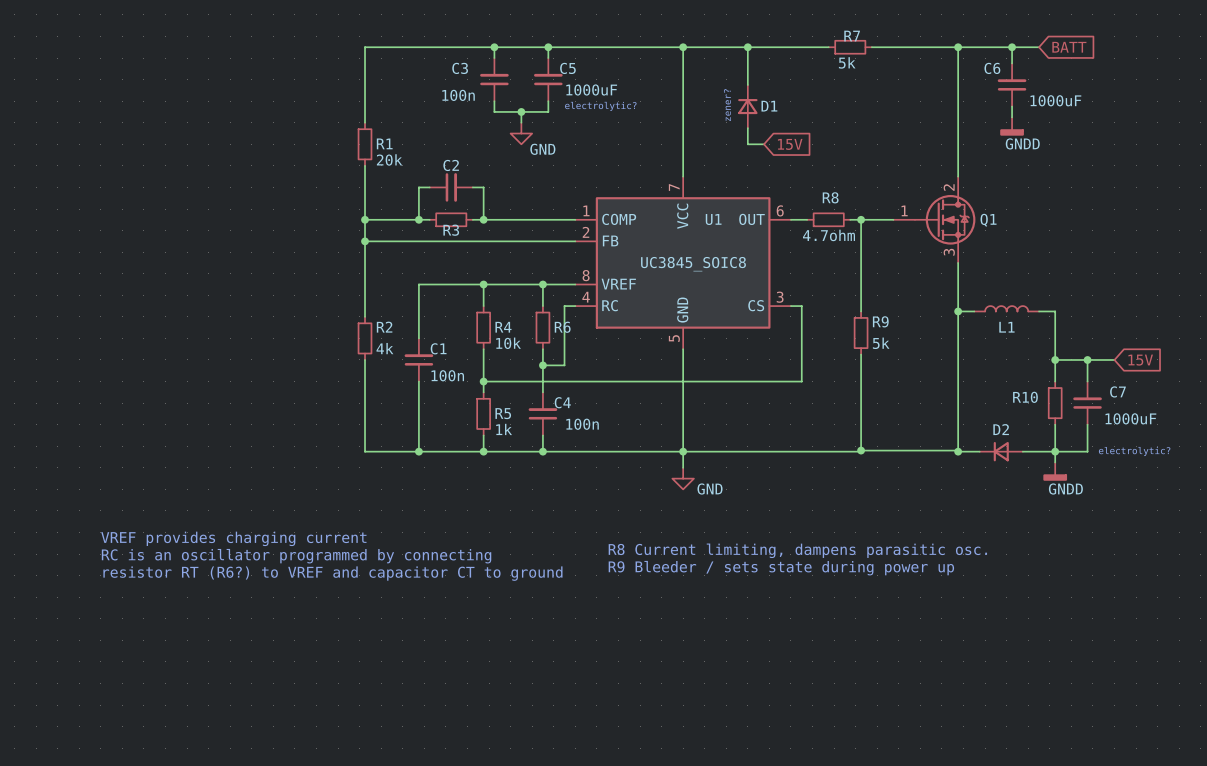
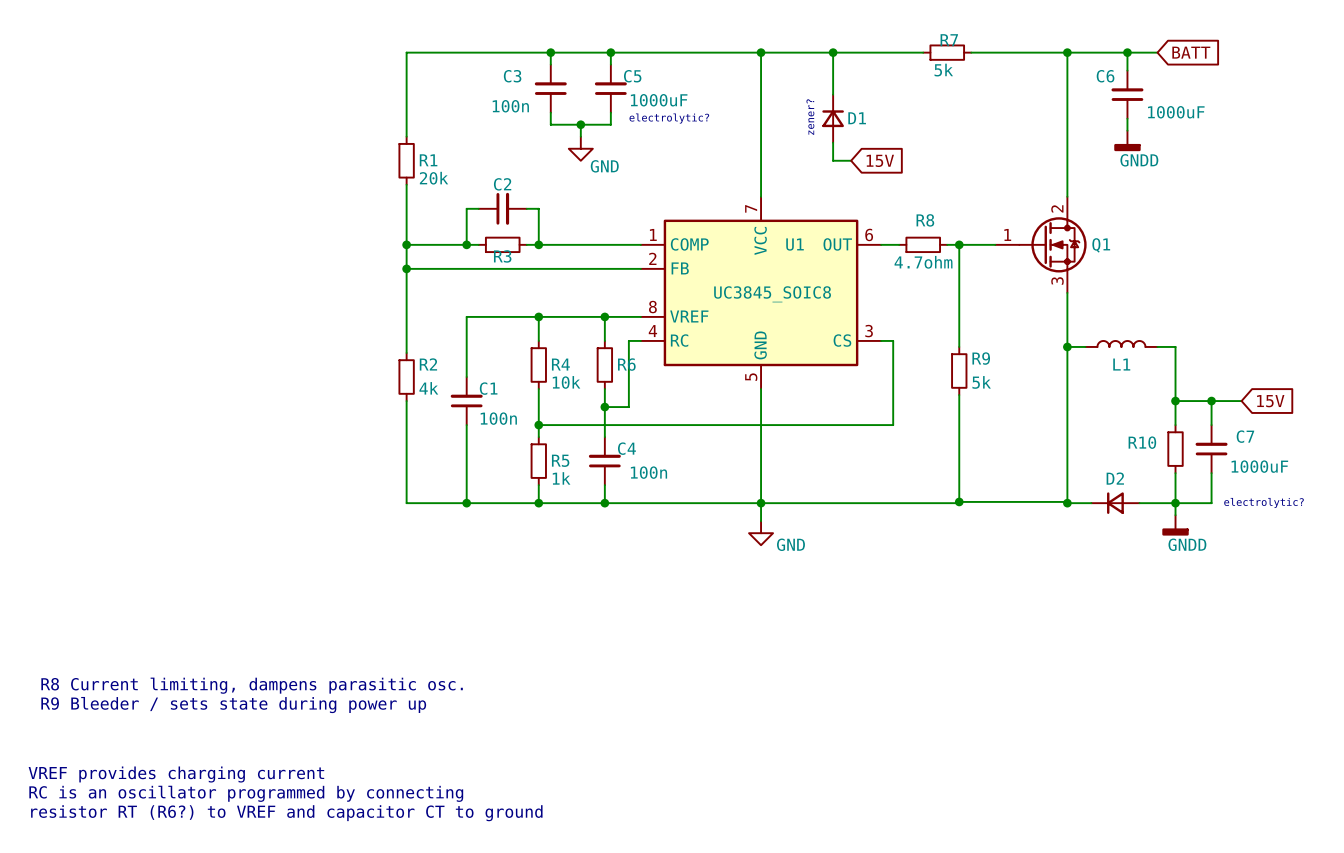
text position: VREF provides charging current (233, 538) -> VREF provides charging current (176, 774)
text: R8 Current limiting, dampens parasitic osc. (797, 550) -> none
text position: RC is an oscillator programmed by connecting (296, 556) -> RC is an oscillator programmed by connecting (246, 793)
text: R9 Bleeder / sets state during power up (781, 568) -> none
text position: resistor RT (R6?) to VREF and capacitor CT to ground (332, 573) -> resistor RT (R6?) to VREF and capacitor CT to ground (286, 813)
text: none -> R8 Current limiting, dampens parasitic osc. (252, 685)
text: none -> R9 Bleeder / sets state during power up (233, 705)

